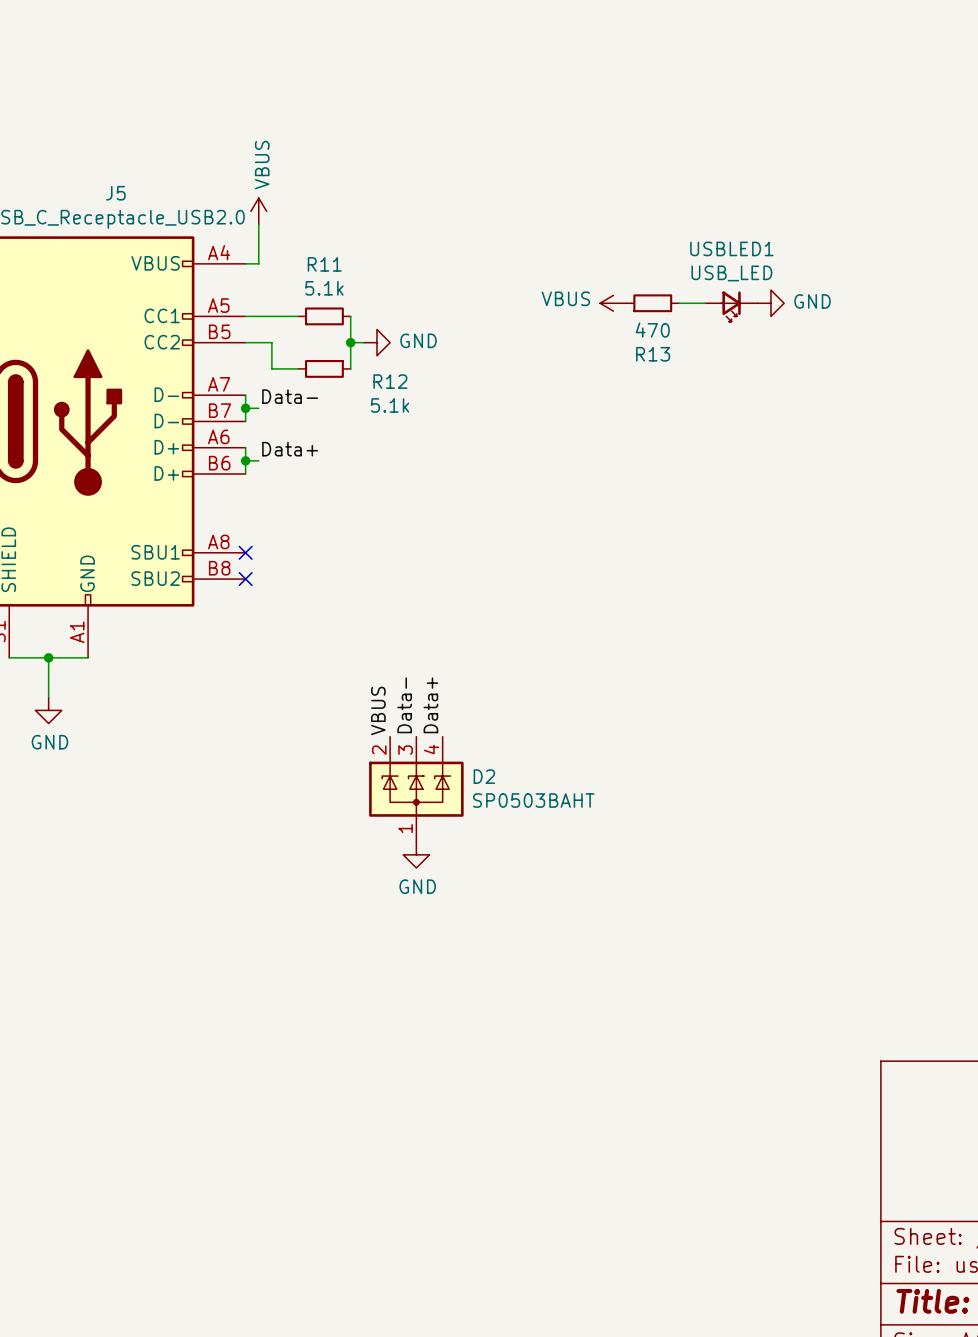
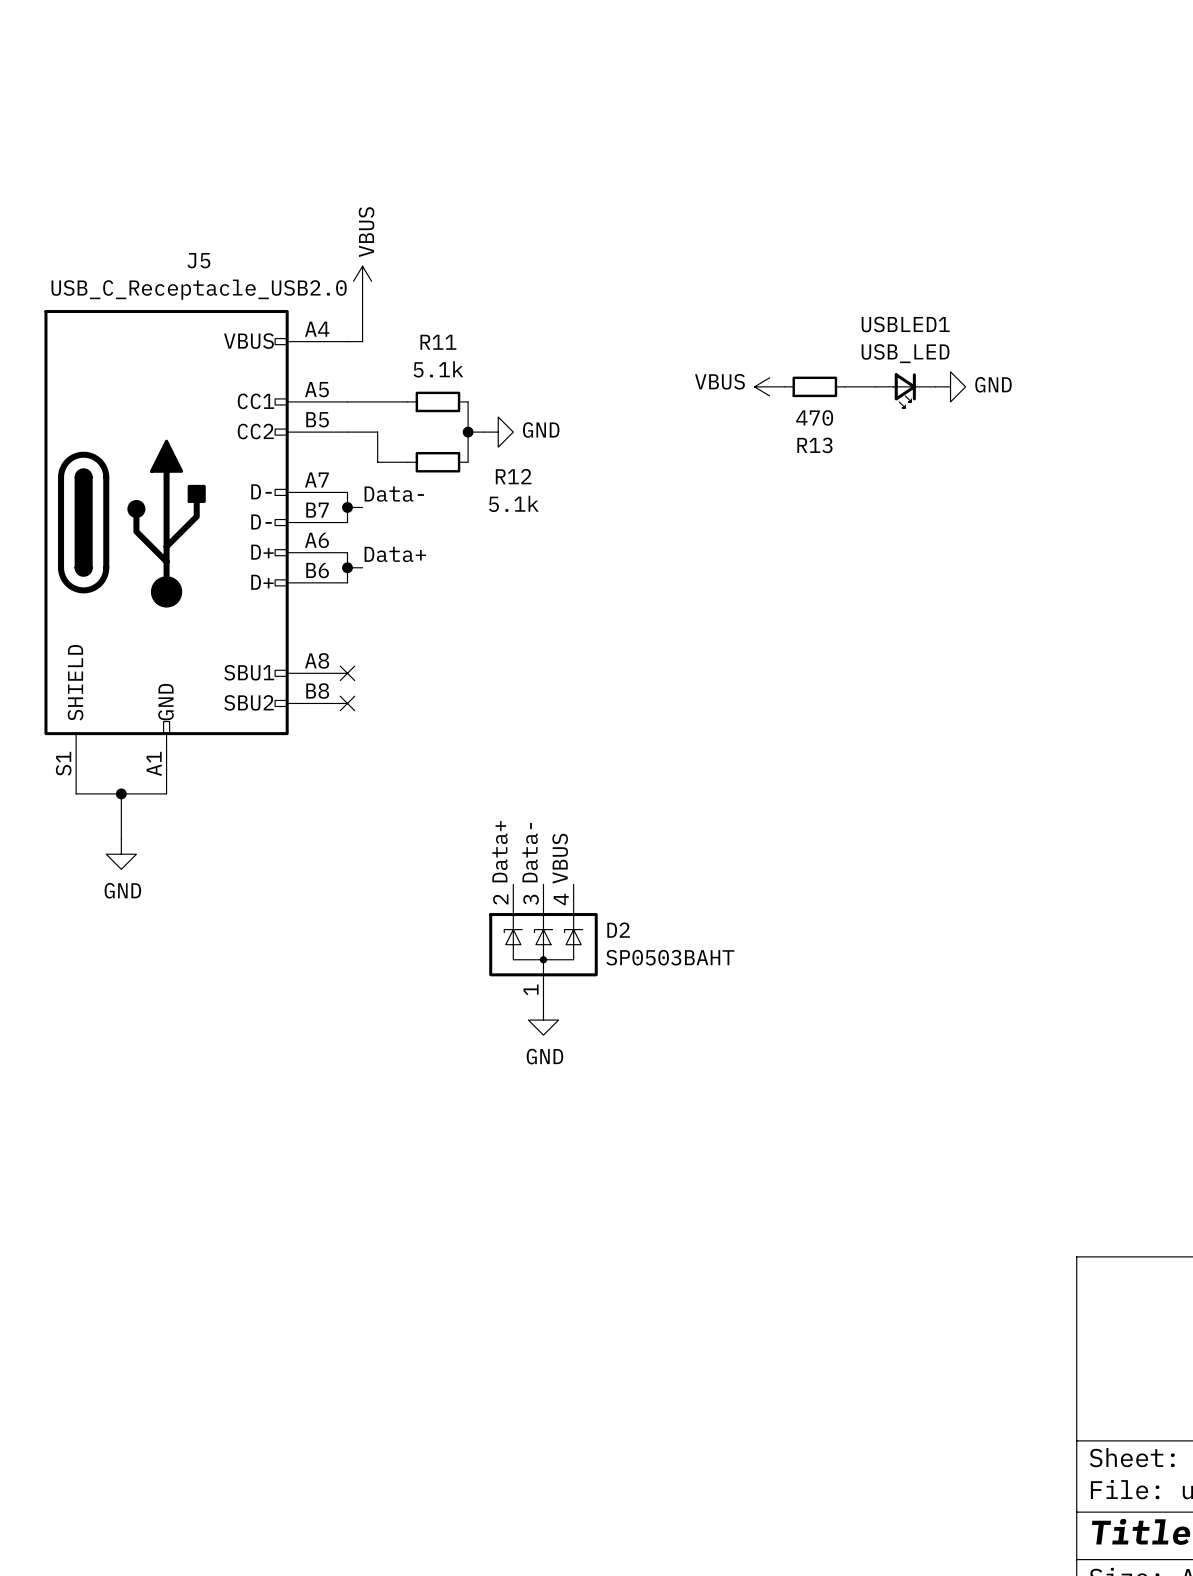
label: Data+ (430, 705) -> VBUS (560, 858)
label: VBUS (378, 710) -> Data+ (500, 851)

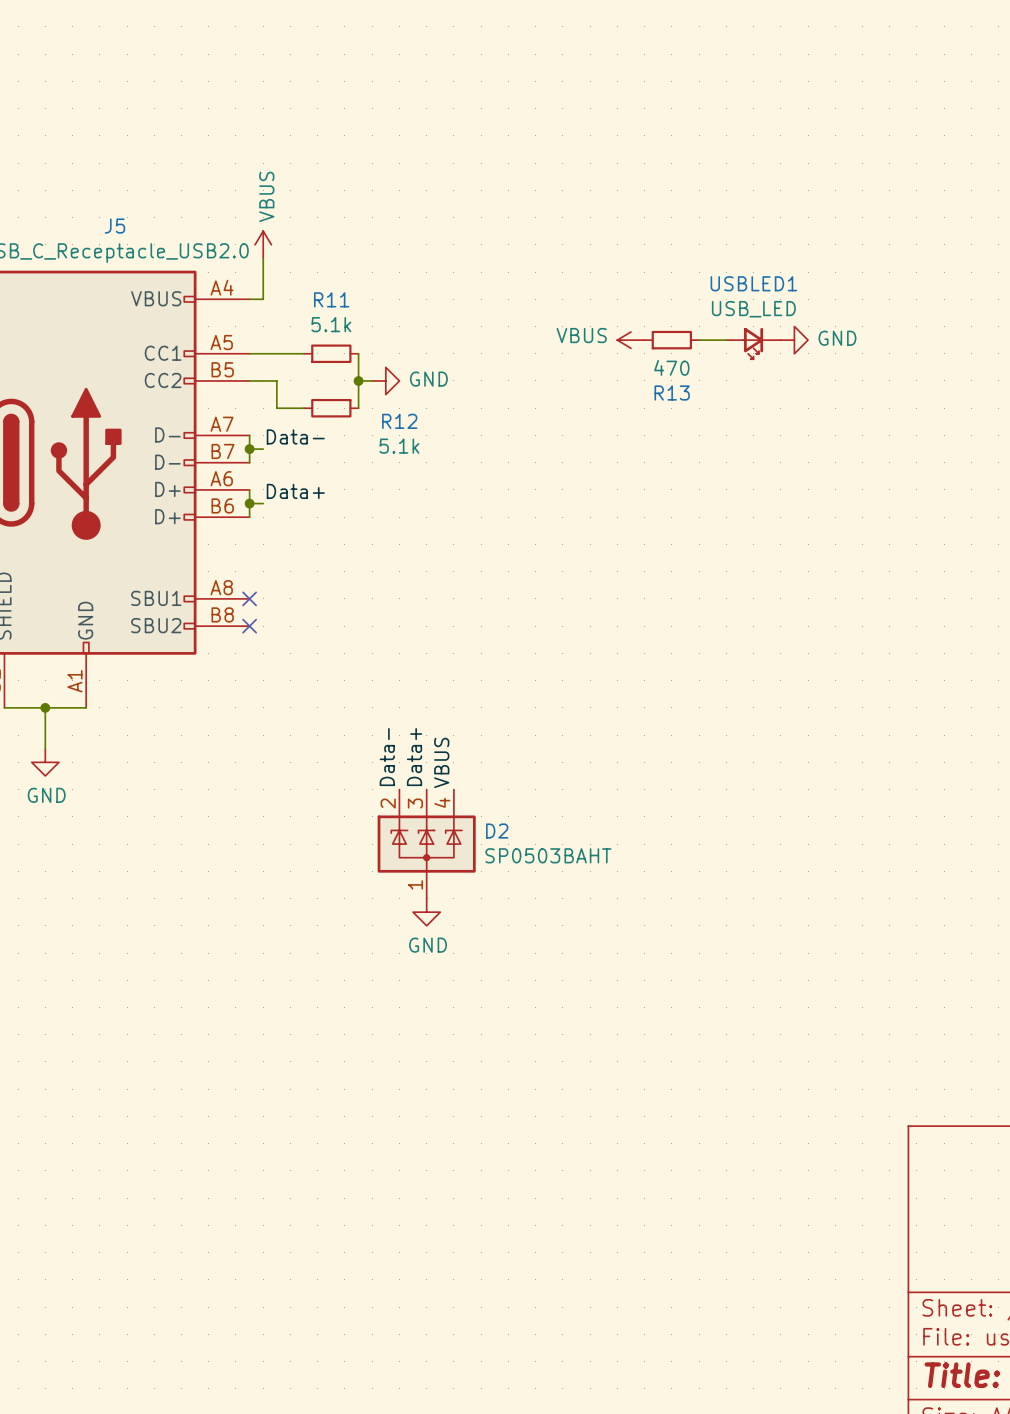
label: Data+ (500, 851) -> Data- (387, 757)
label: Data- (530, 852) -> Data+ (414, 757)

